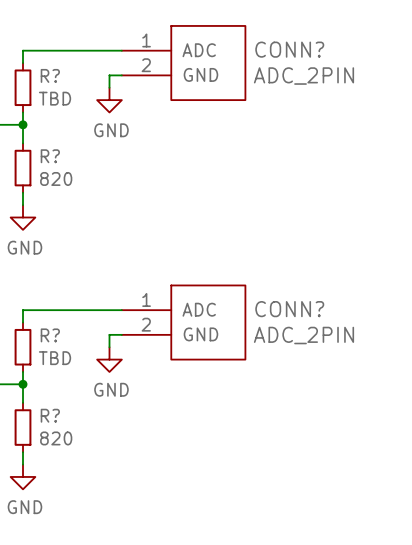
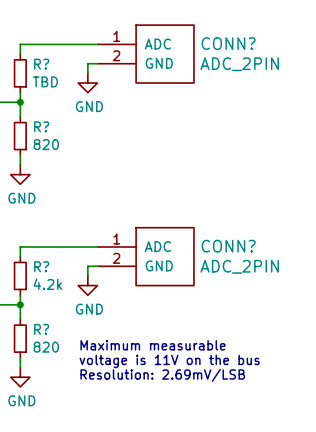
R? value: TBD (55, 358) -> 4.2k (47, 284)
text: none -> Maximum measurable (153, 345)
text: none -> voltage is 11V on the bus (169, 361)
text: none -> Resolution: 2.69mV/LSB (162, 375)

